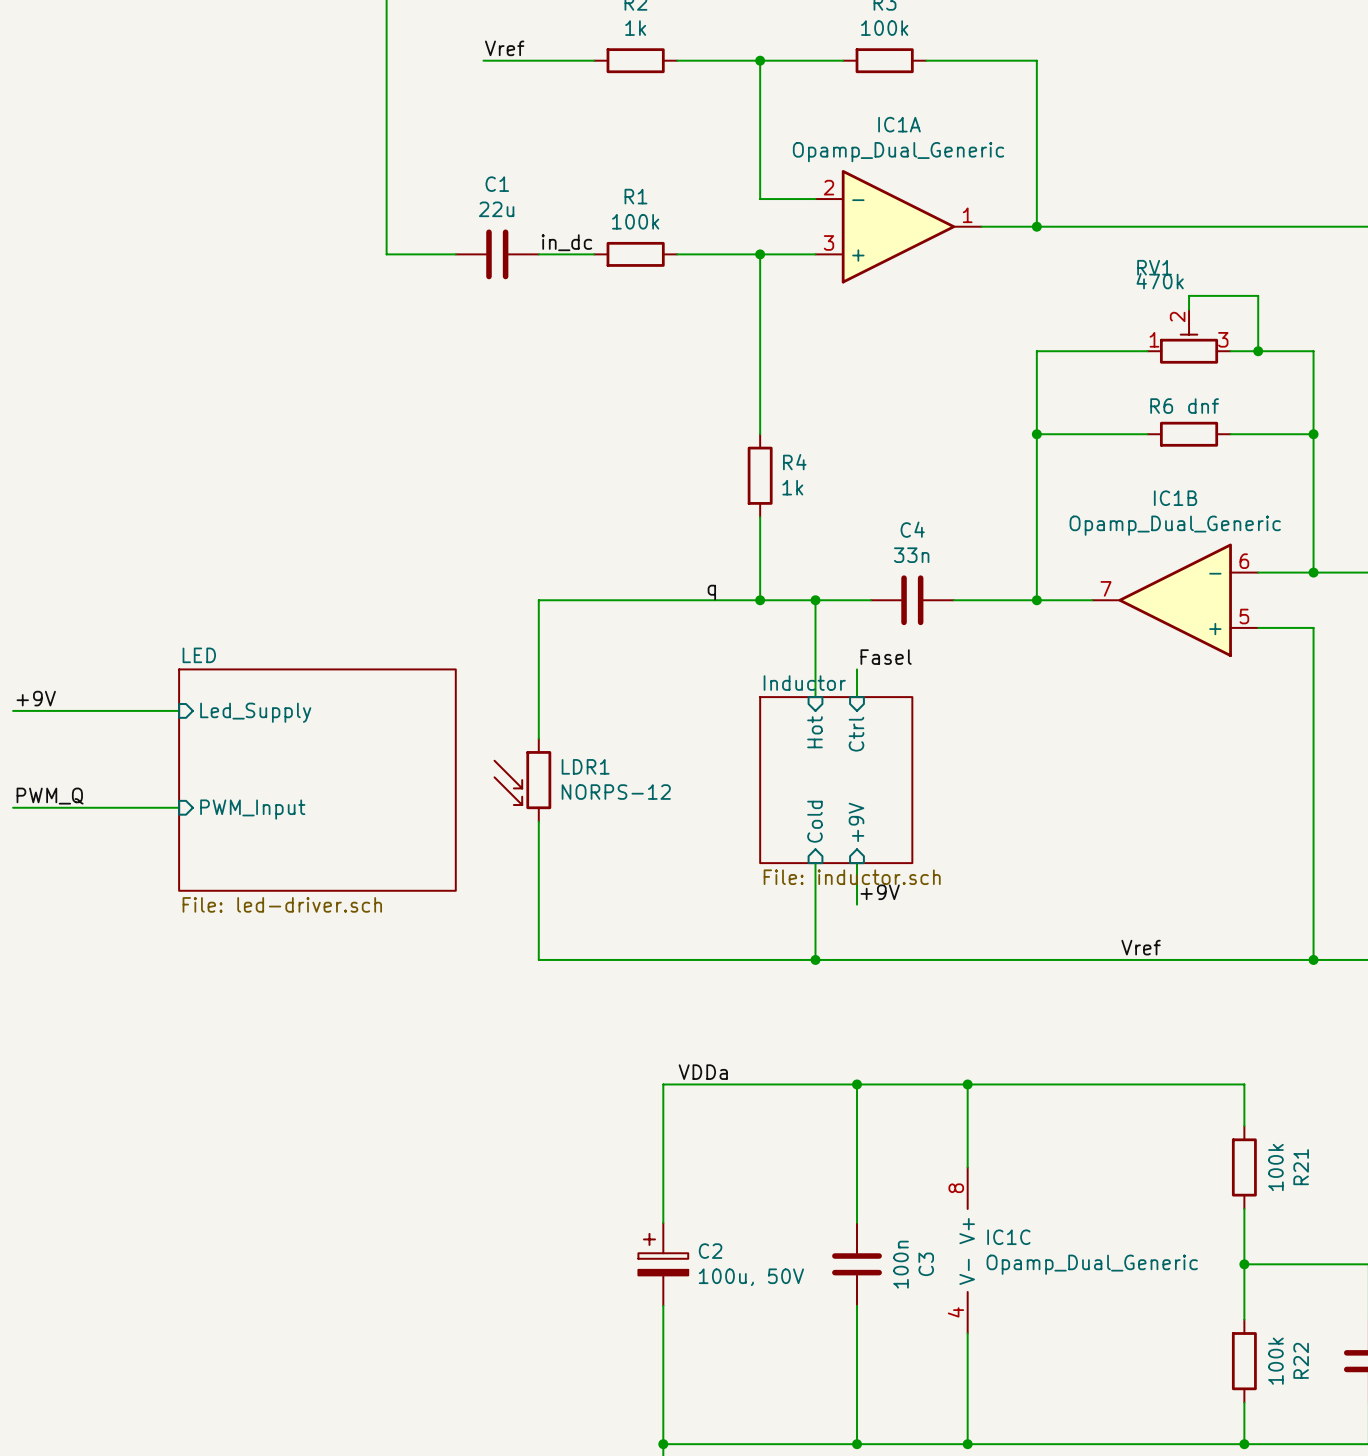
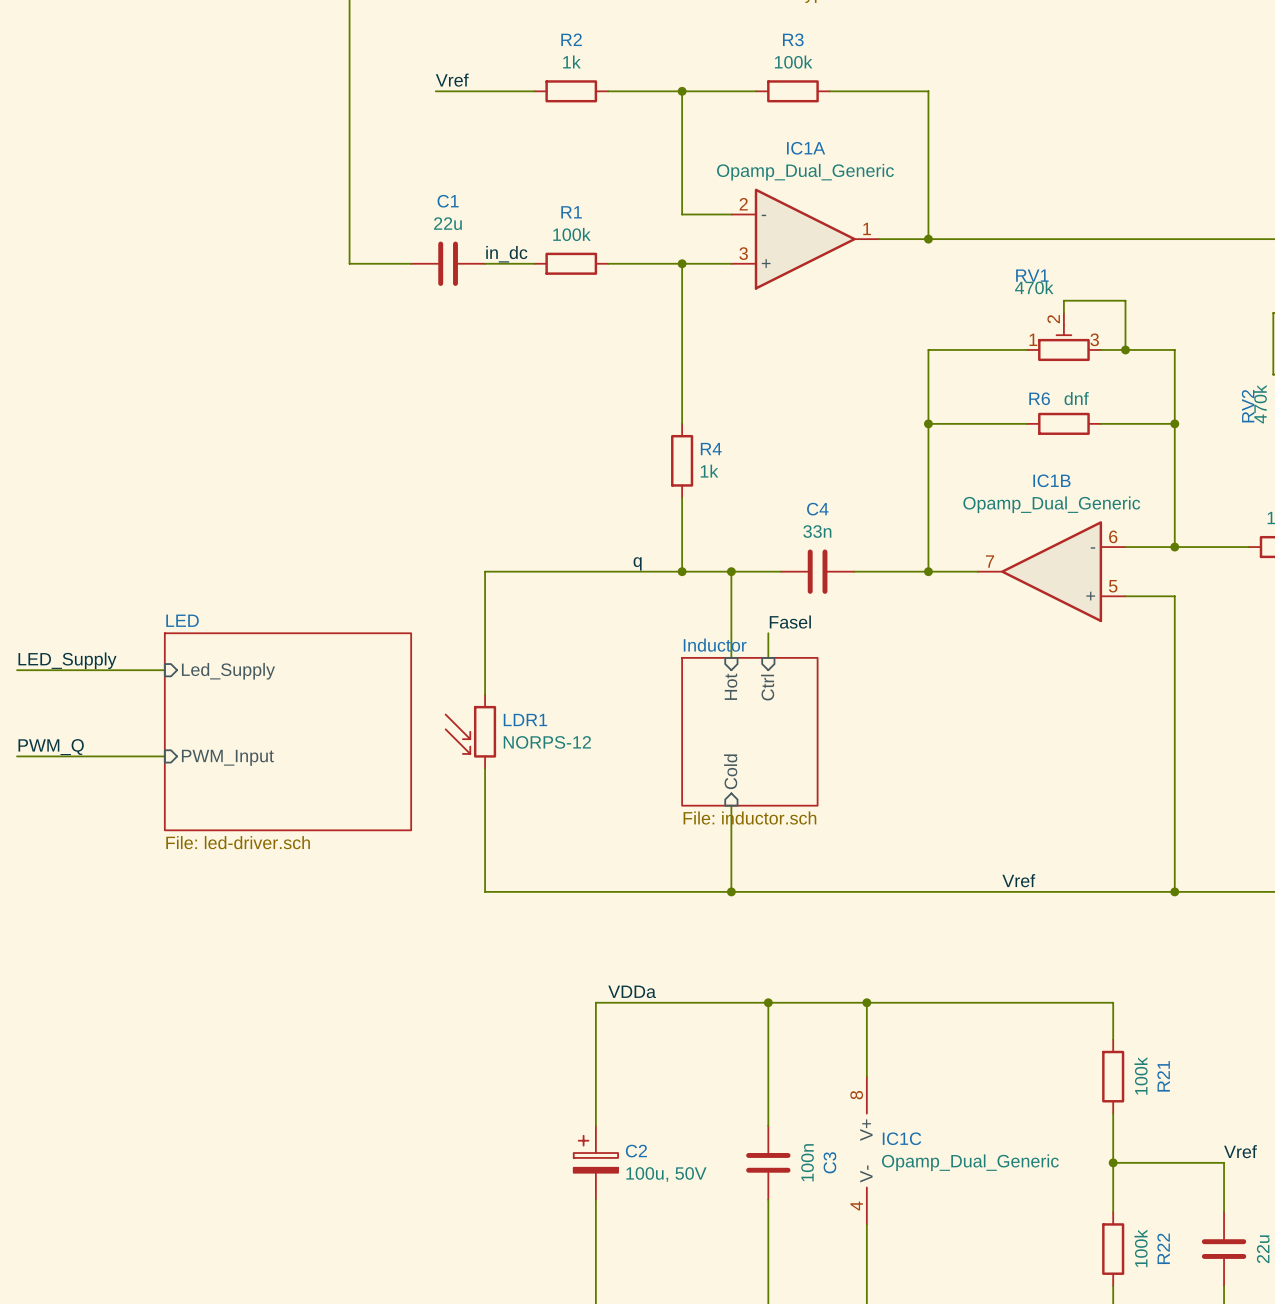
label: +9V (36, 698) -> LED_Supply (67, 660)
sheet pin: +9V (856, 822) -> none
wire: (857, 863) (857, 904) -> none
label: +9V (880, 892) -> none

